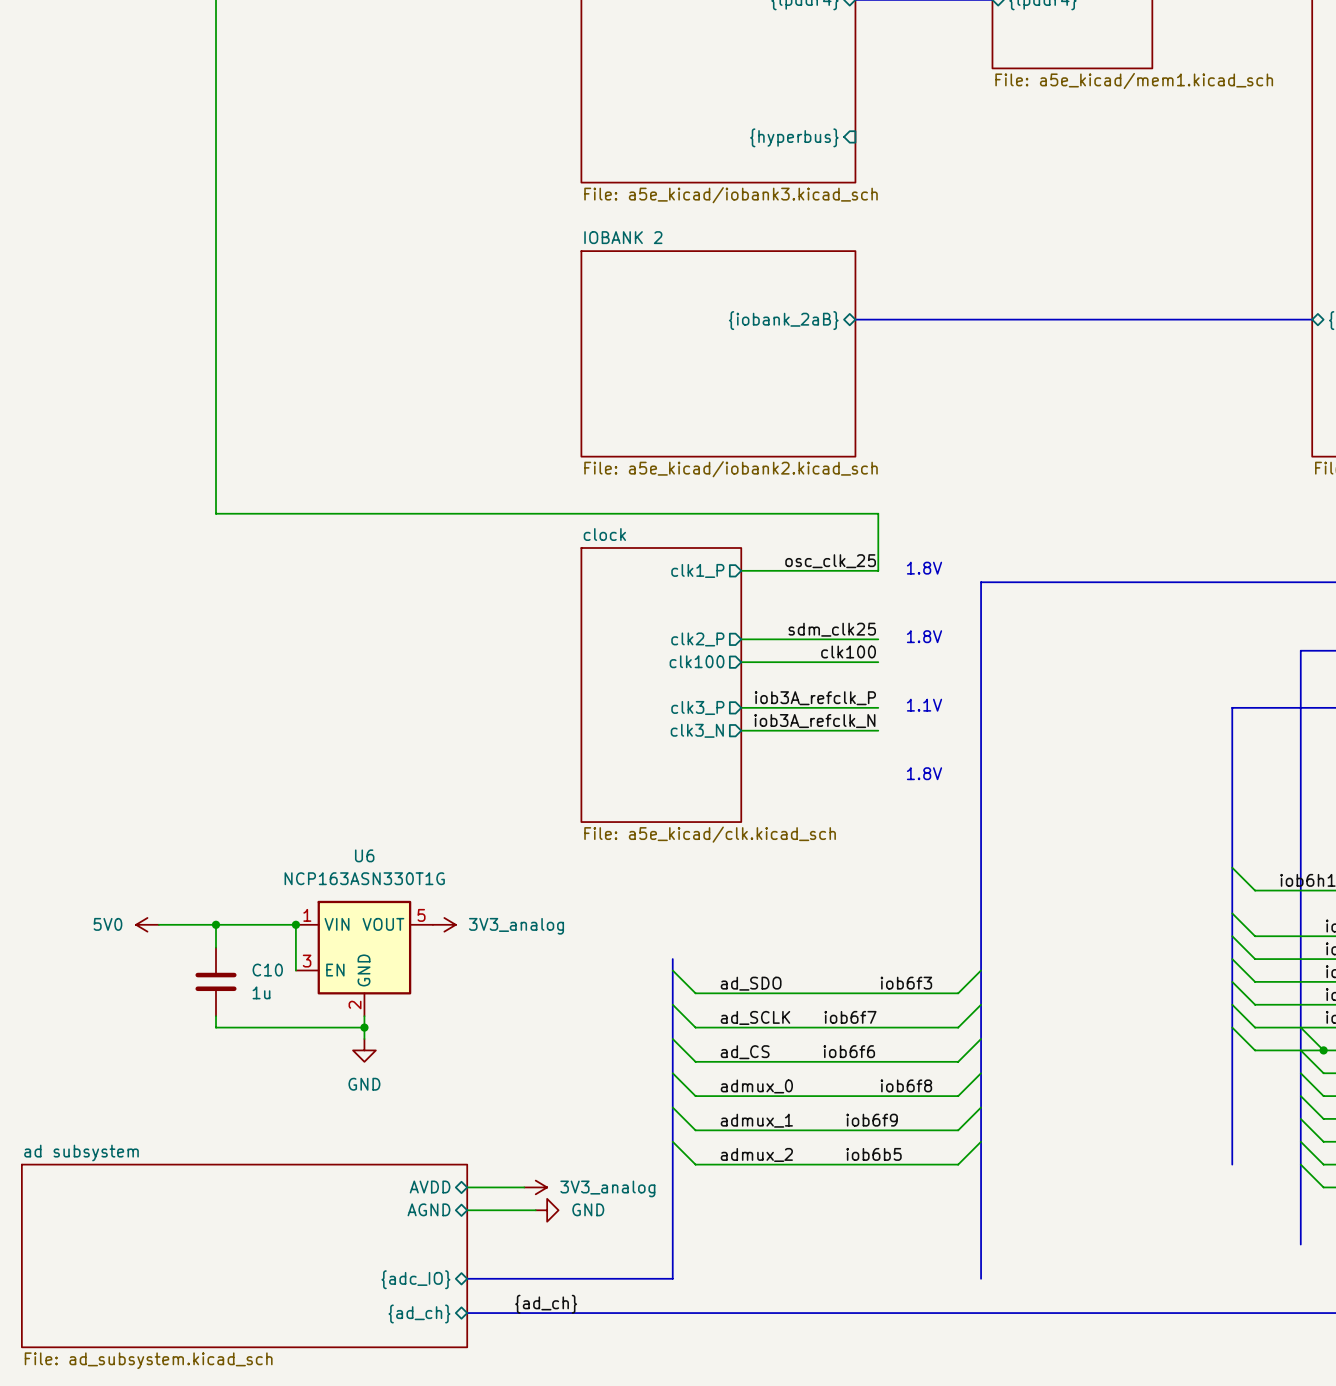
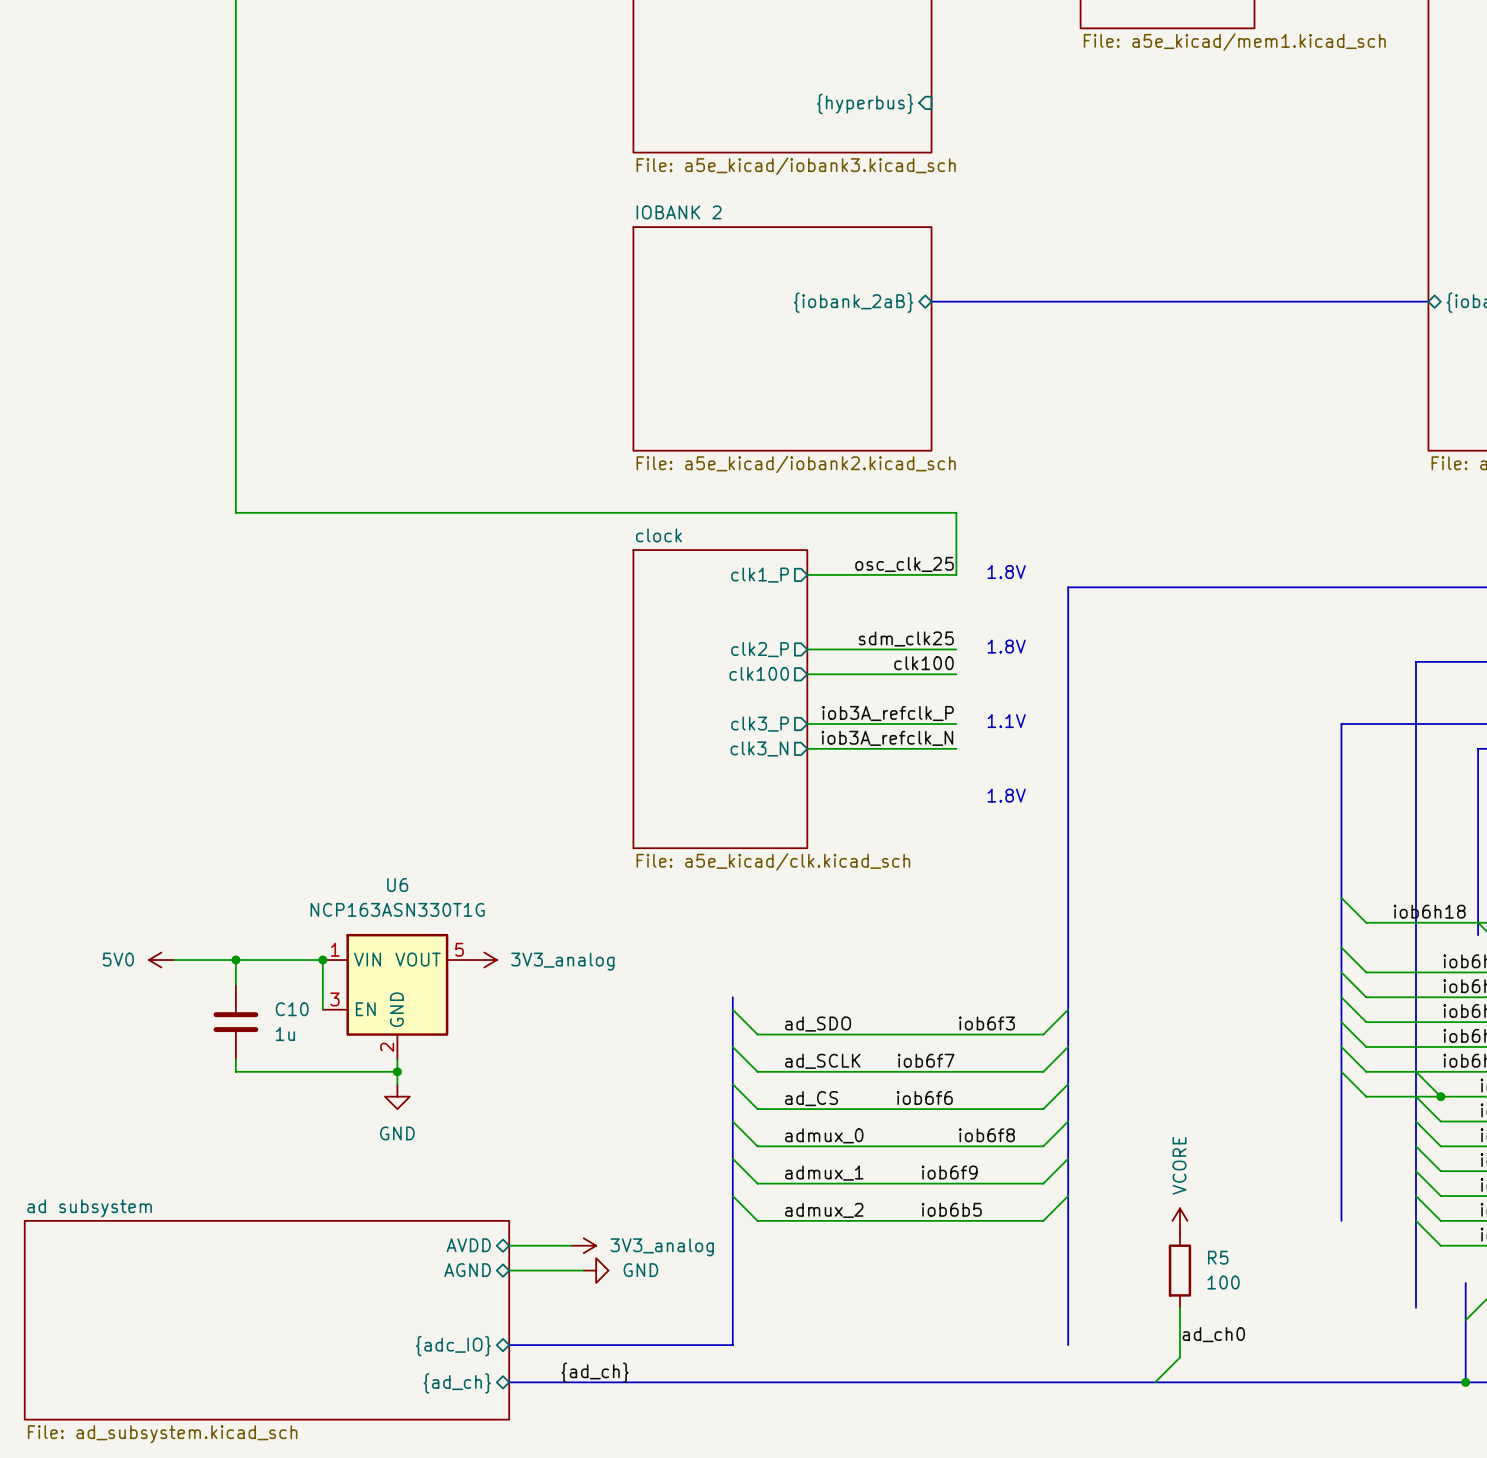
power symbol: none -> VCORE (1179, 1220)
R5: none -> 100 (1179, 1270)
wire: none -> (1179, 1307) (1179, 1357) (1155, 1382)
label: none -> ad_ch0 (1213, 1334)

